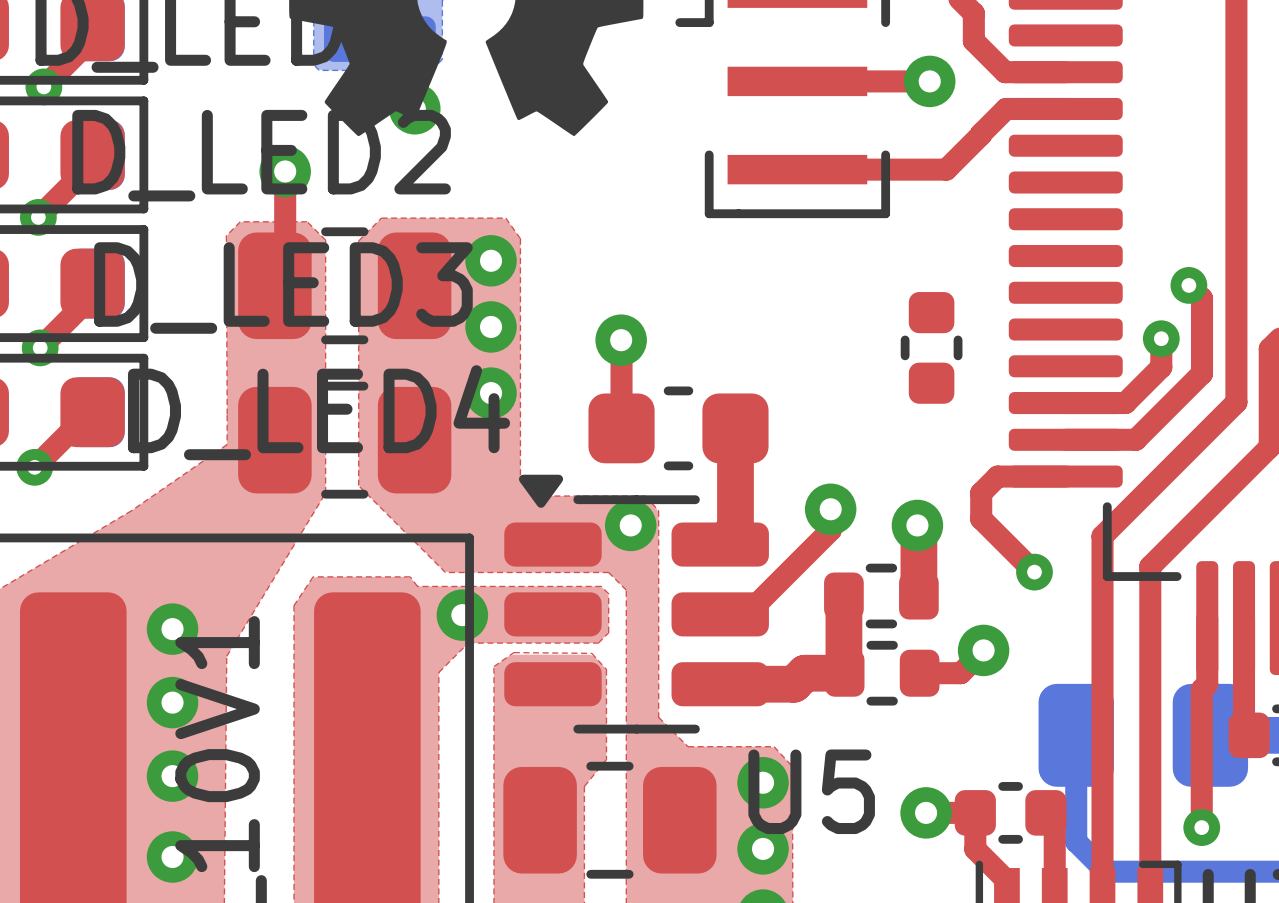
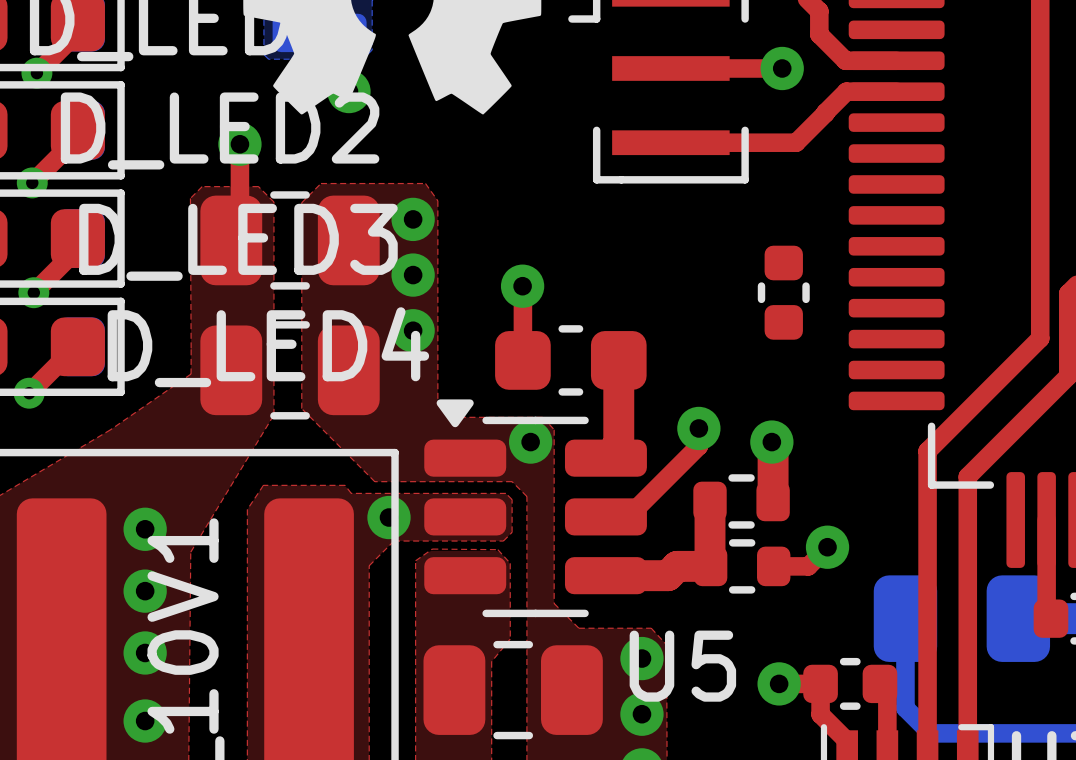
top track: (1188, 285) (1202, 298) (1202, 373) (1135, 439) (1065, 439) -> none
via: (1188, 285) -> none
top track: (1161, 338) (1161, 367) (1125, 403) (1065, 403) -> none
via: (1161, 338) -> none
top track: (1065, 476) (997, 476) (981, 493) (981, 518) (1034, 572) -> none
via: (1034, 572) -> none
top track: (1207, 618) (1207, 684) (1201, 689) (1201, 827) -> none
via: (1201, 827) -> none

